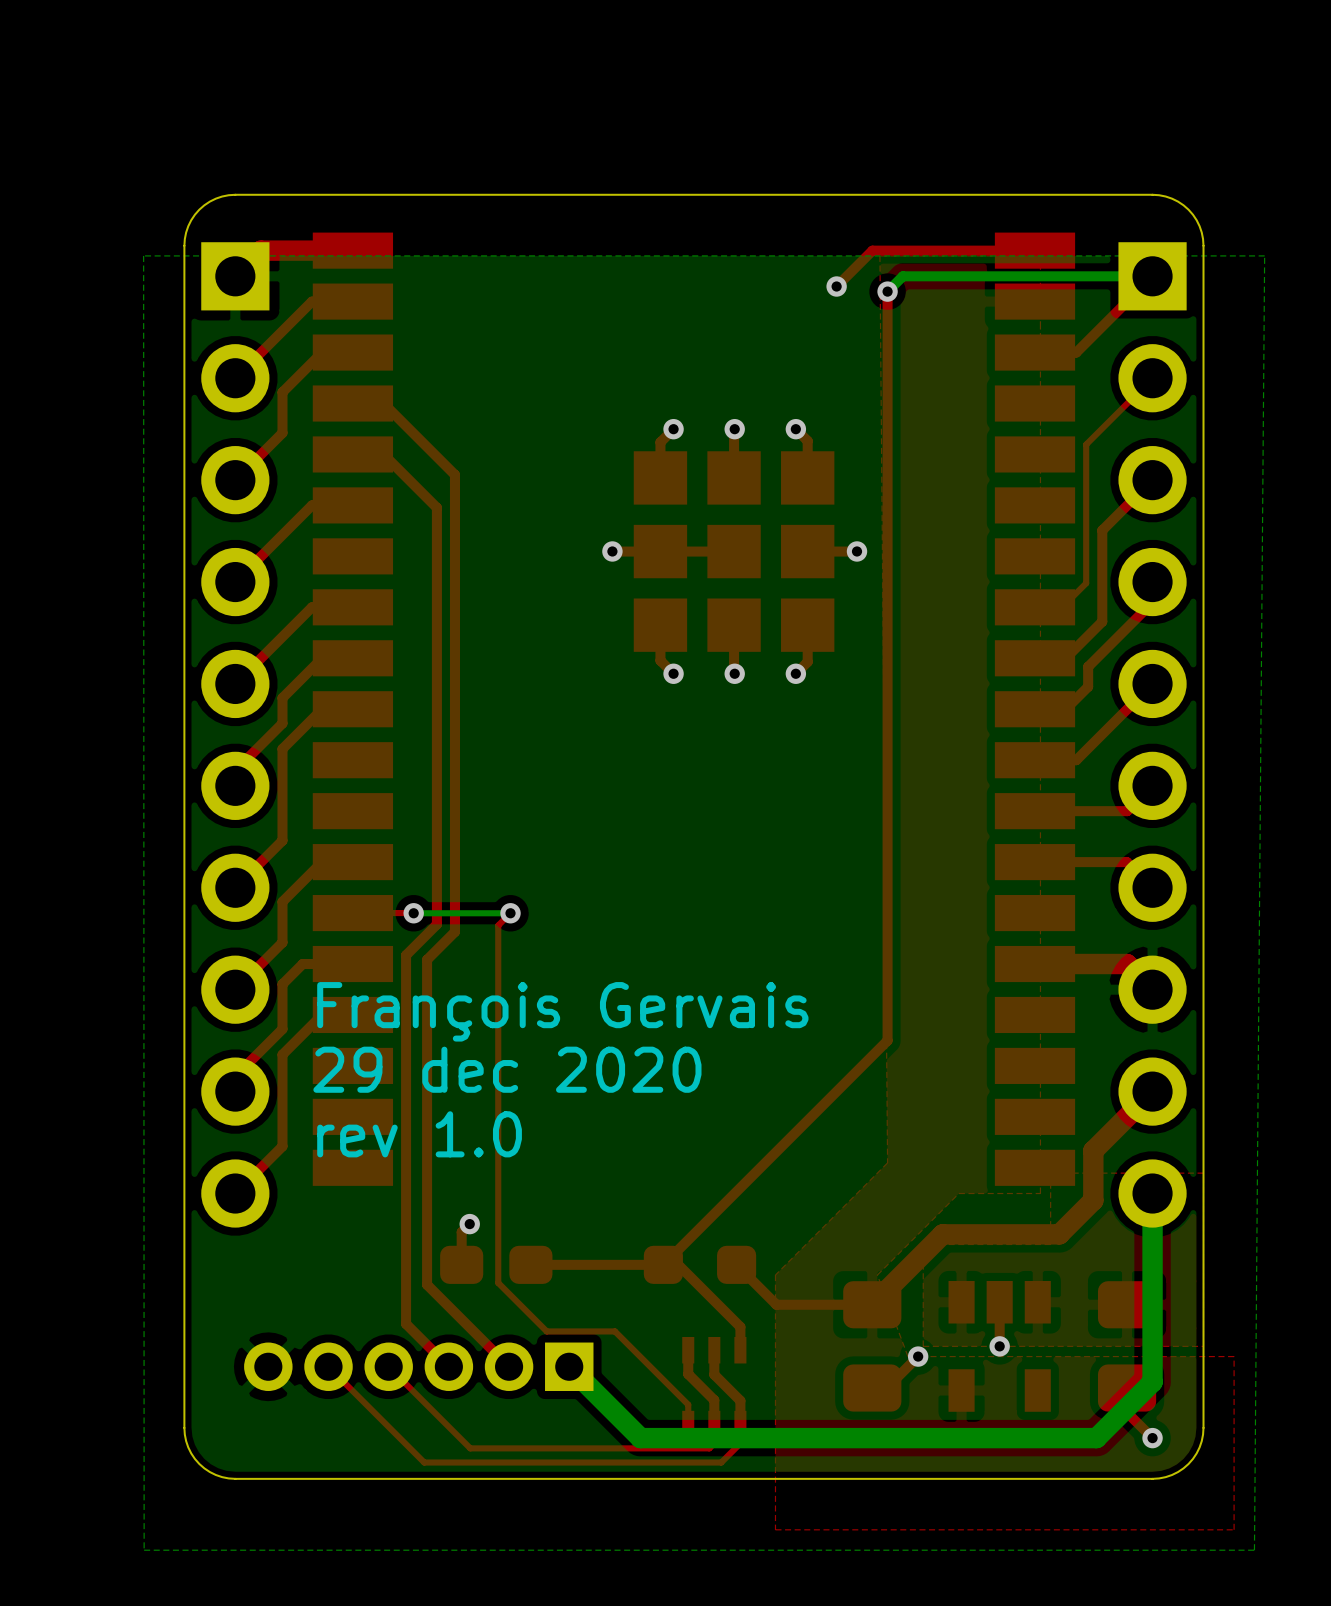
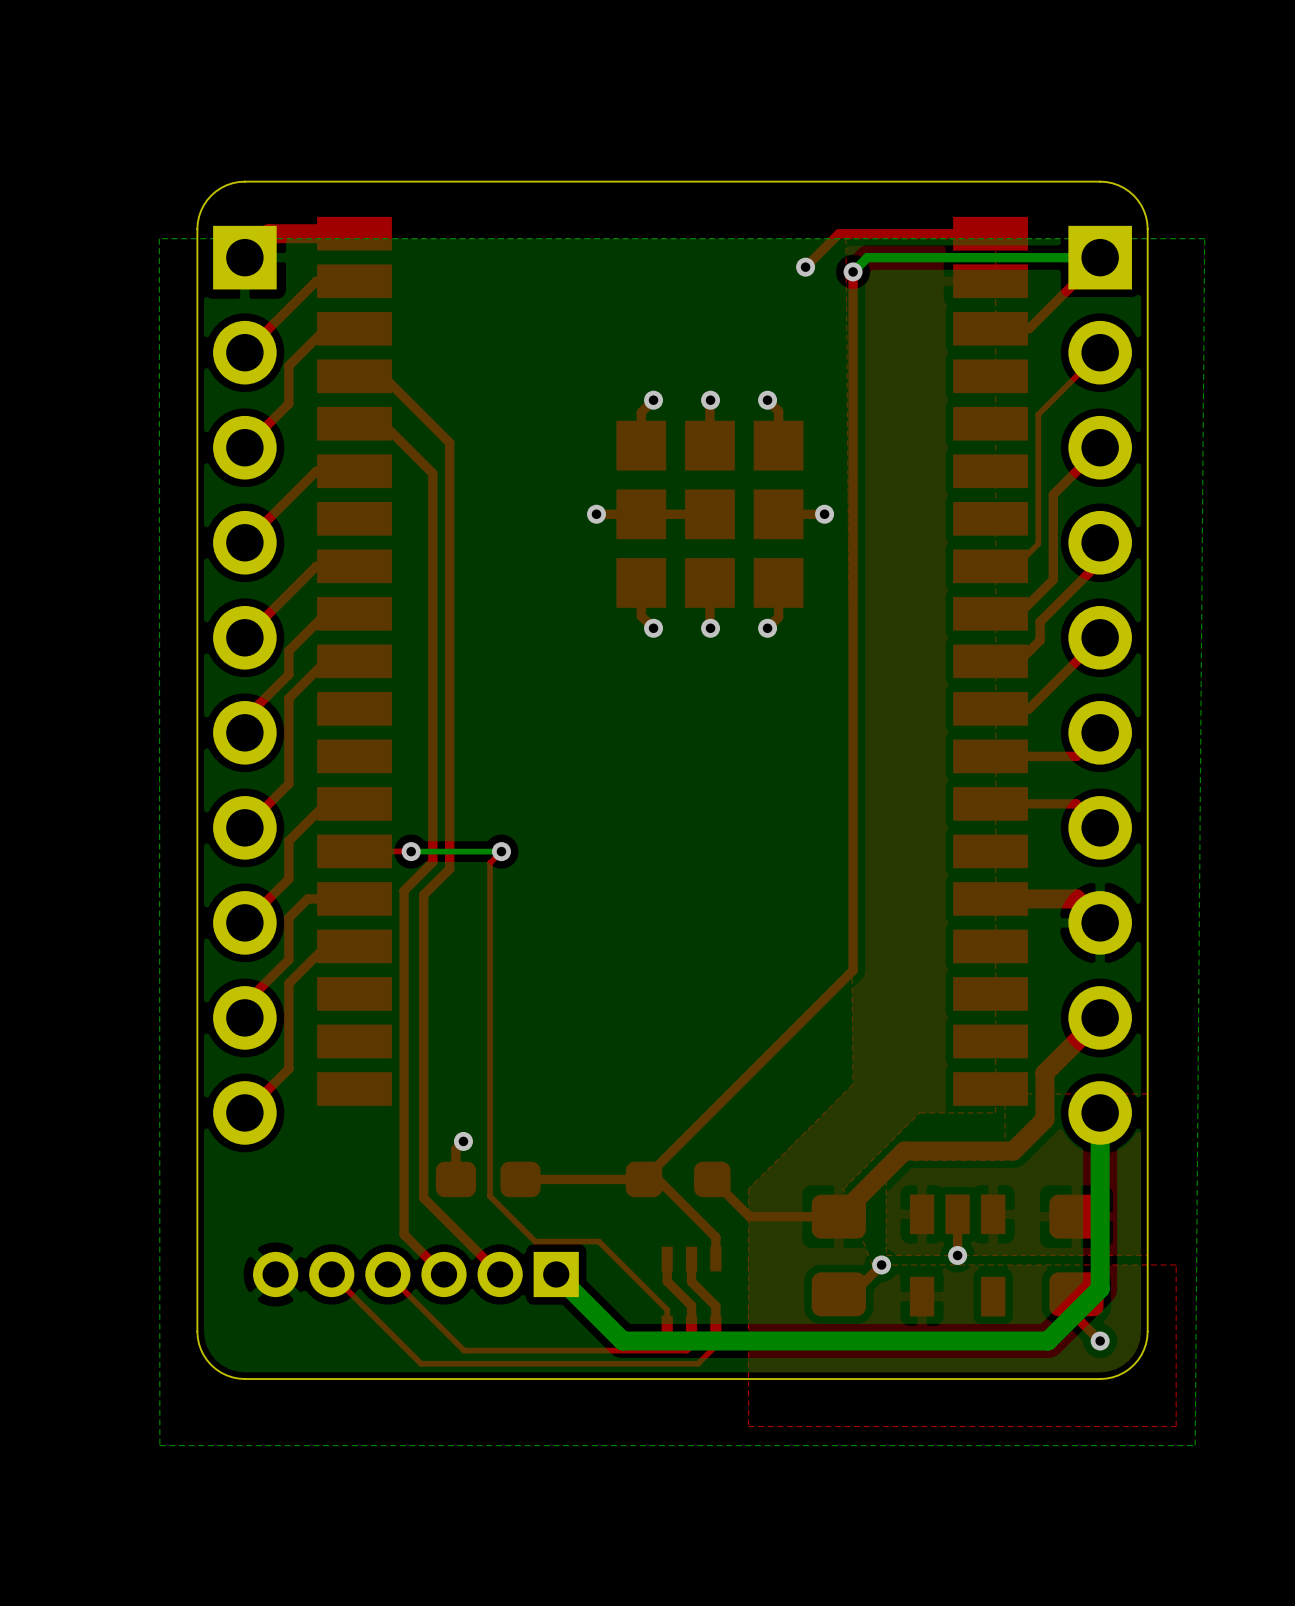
text: François Gervais (562, 1011) -> none
text: 29 dec 2020 (507, 1069) -> none
text: rev 1.0 (419, 1134) -> none

